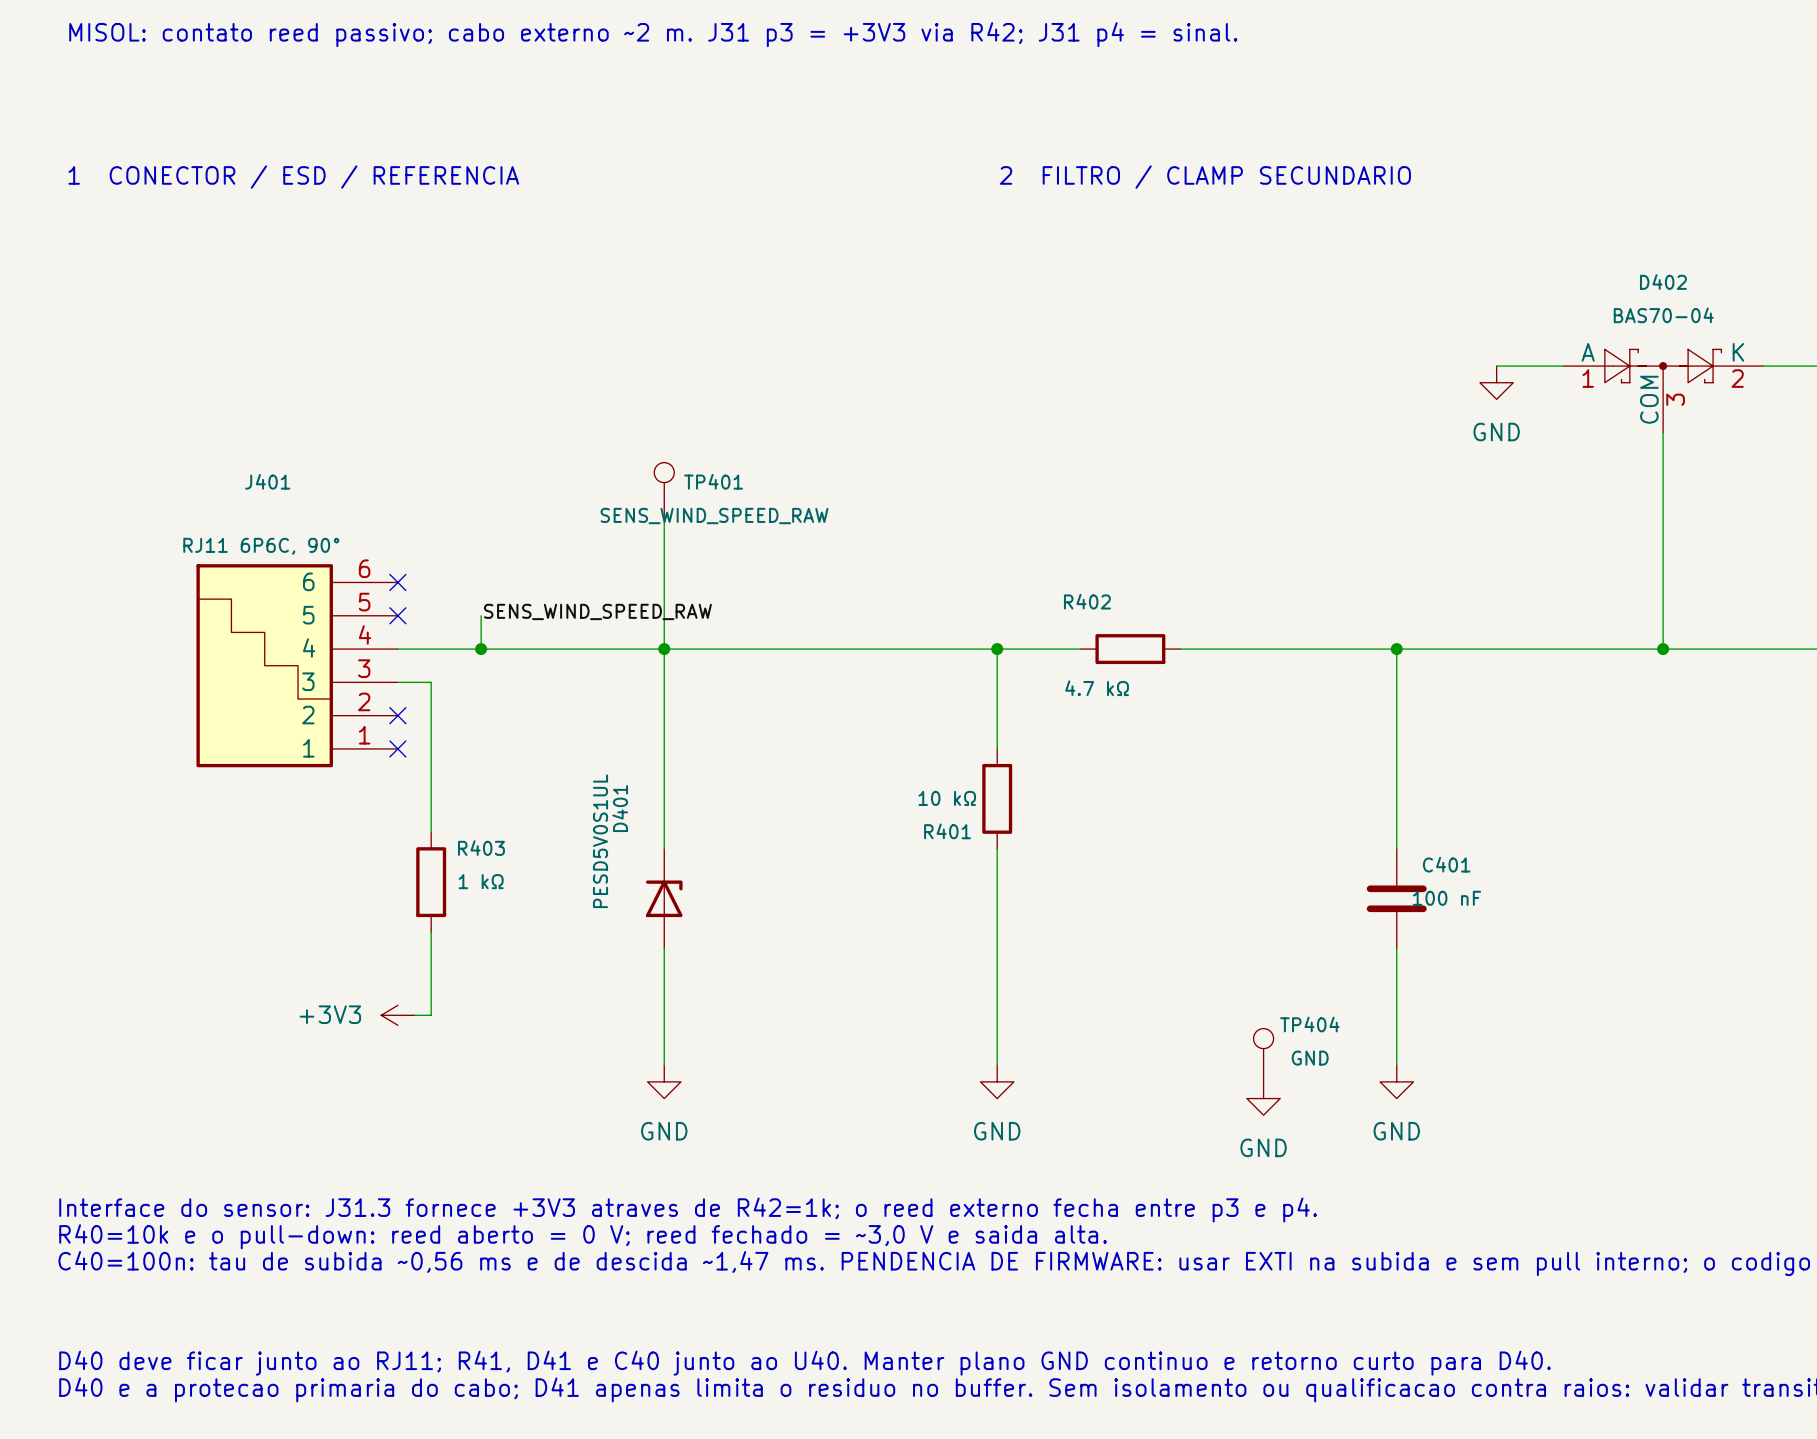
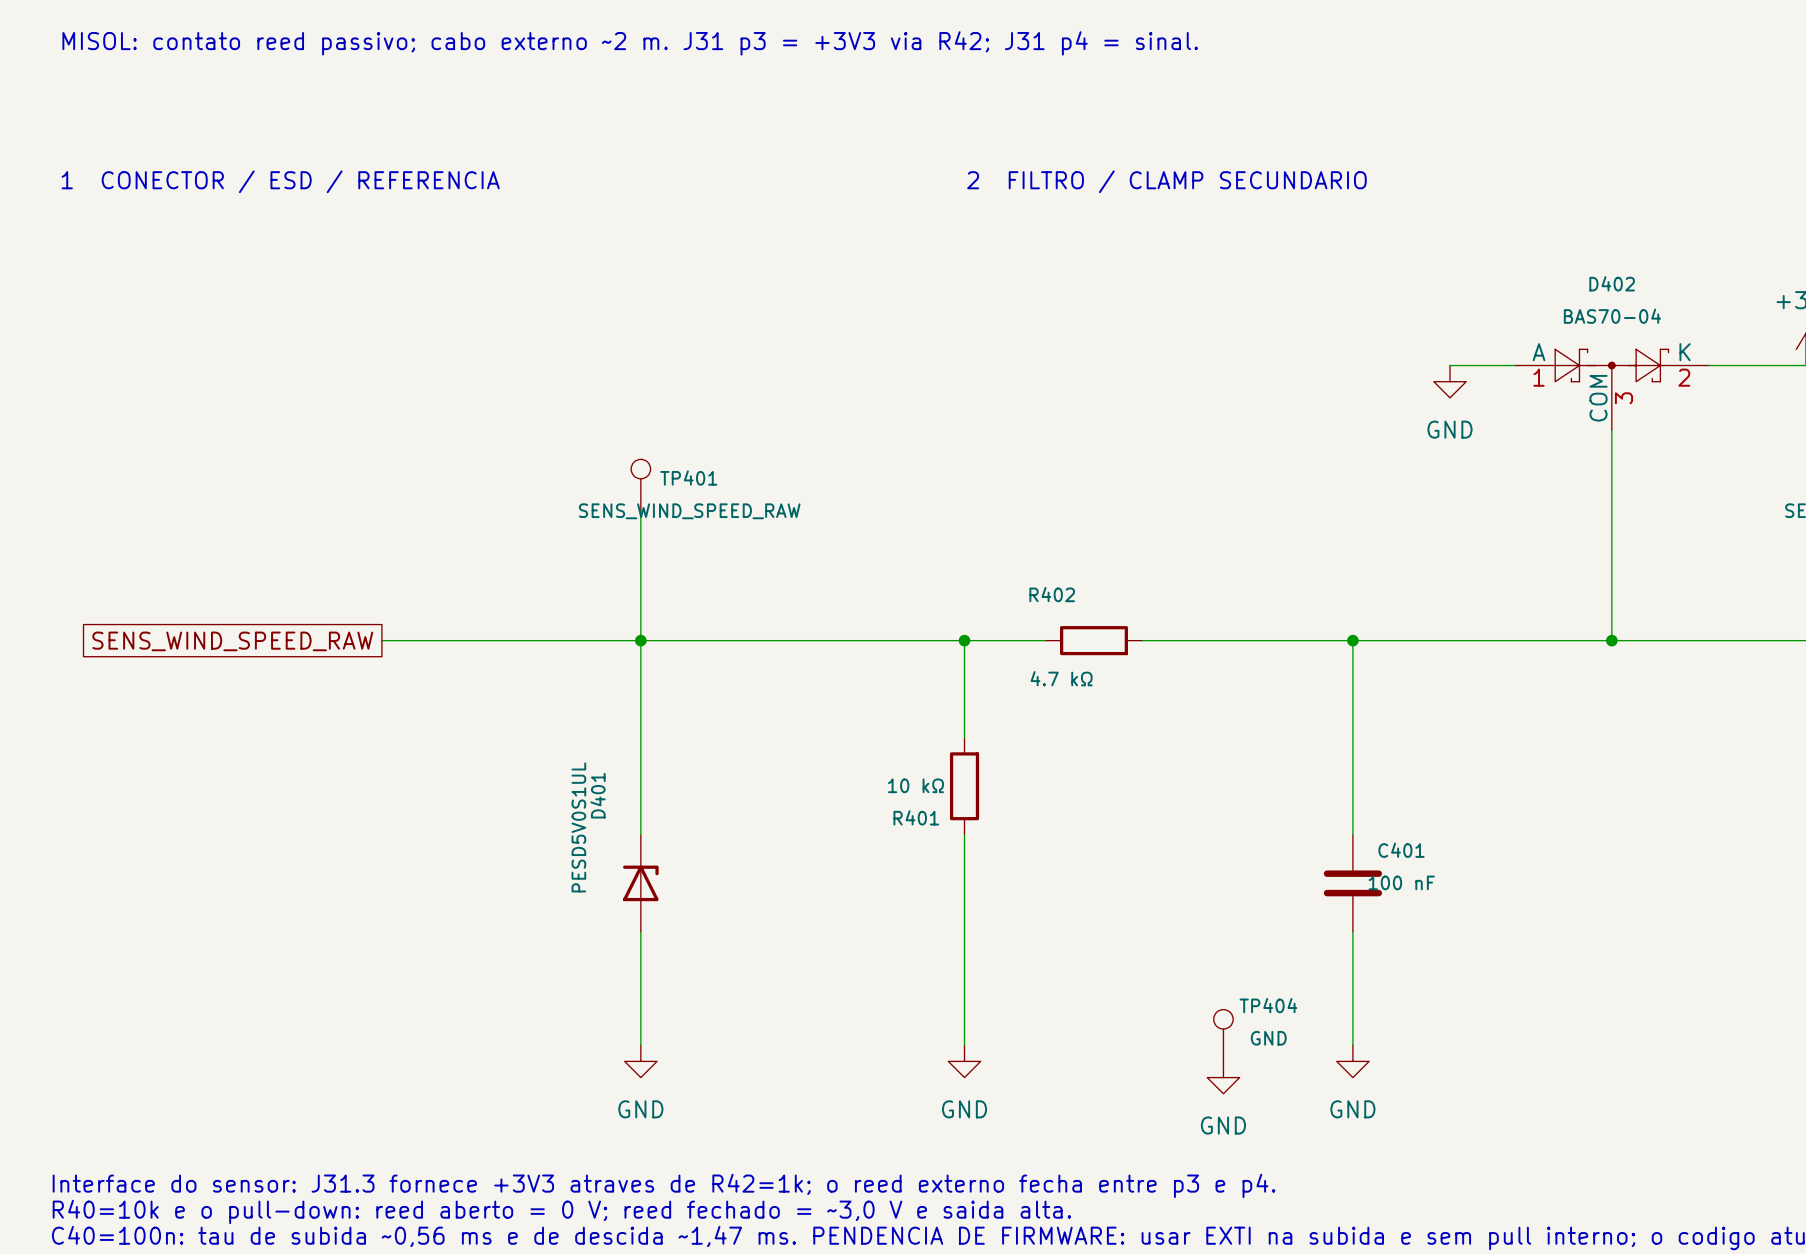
no-connect mark: (397, 582) -> none
label: SENS_WIND_SPEED_RAW (597, 611) -> none
no-connect mark: (397, 615) -> none
wire: (481, 615) (481, 649) -> none
global label: none -> SENS_WIND_SPEED_RAW (232, 641)
junction: (481, 649) -> none
J401: RJ11 6P6C, 90° (297, 665) -> none
wire: (397, 682) (431, 682) (431, 832) -> none
no-connect mark: (397, 715) -> none
no-connect mark: (397, 748) -> none
R403: 1 kΩ (431, 882) -> none
wire: (431, 932) (431, 1015) (414, 1015) -> none
power symbol: +3V3 (397, 1015) -> none

